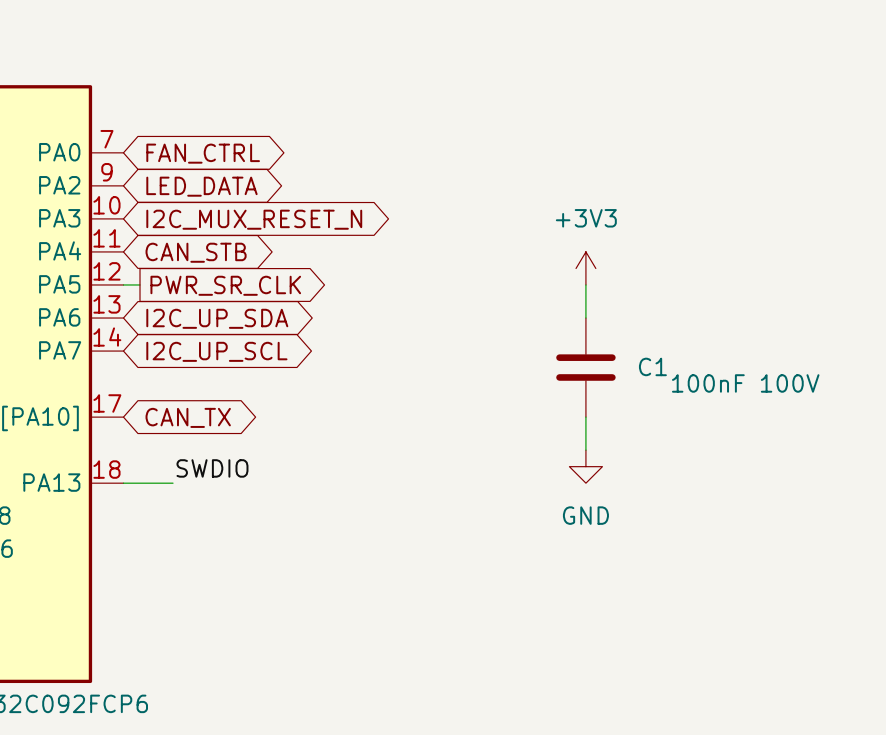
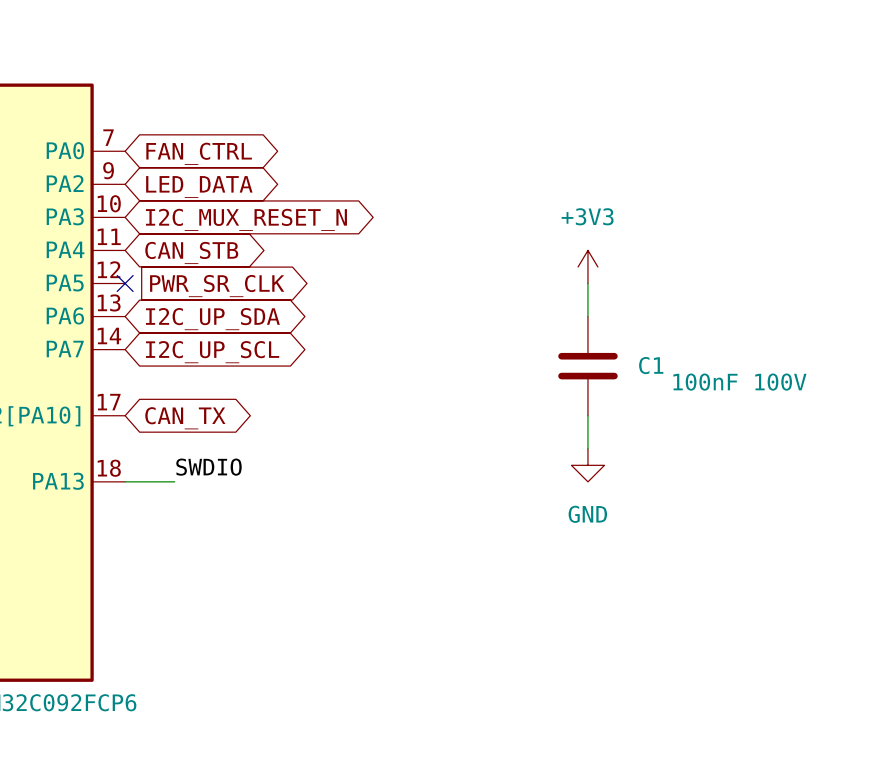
wire: (123, 284) (140, 284) -> none
no-connect mark: none -> (125, 283)

